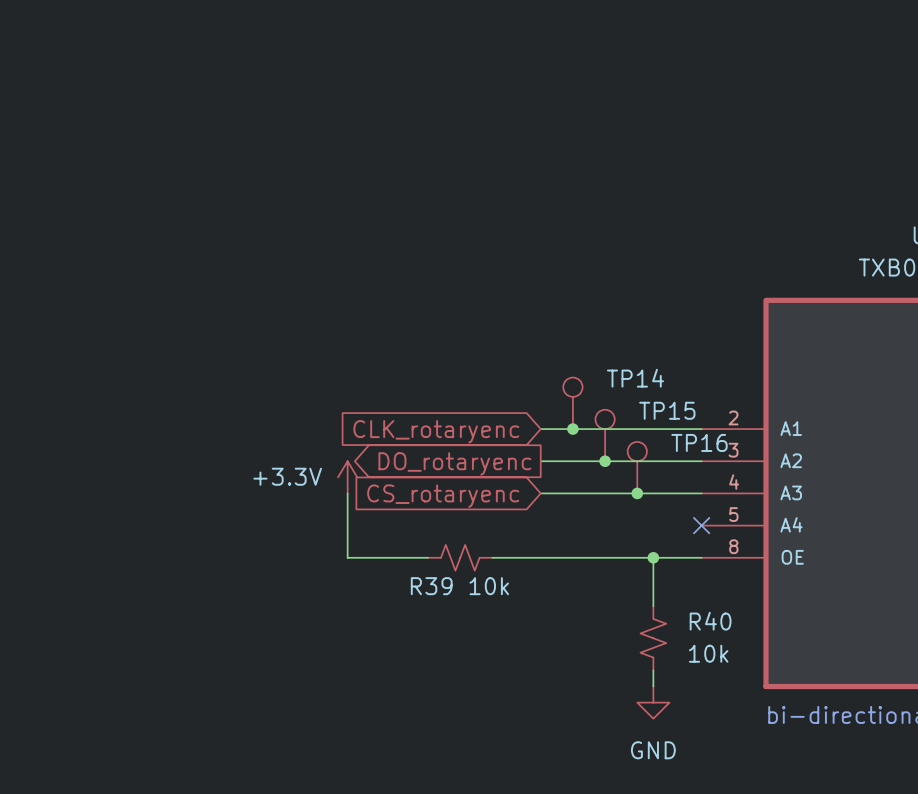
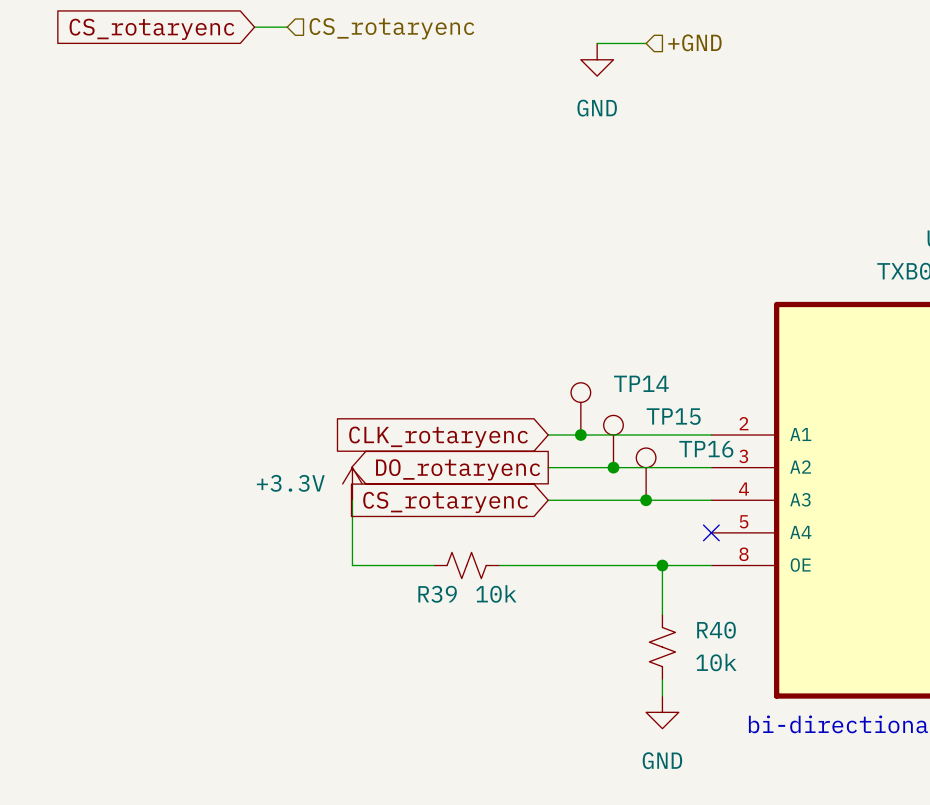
wire: none -> (254, 27) (287, 27)
hierarchical label: none -> CS_rotaryenc (391, 28)
global label: none -> CS_rotaryenc (151, 29)
wire: none -> (597, 43) (646, 43)
hierarchical label: none -> +GND (694, 42)
power symbol: none -> GND (597, 59)

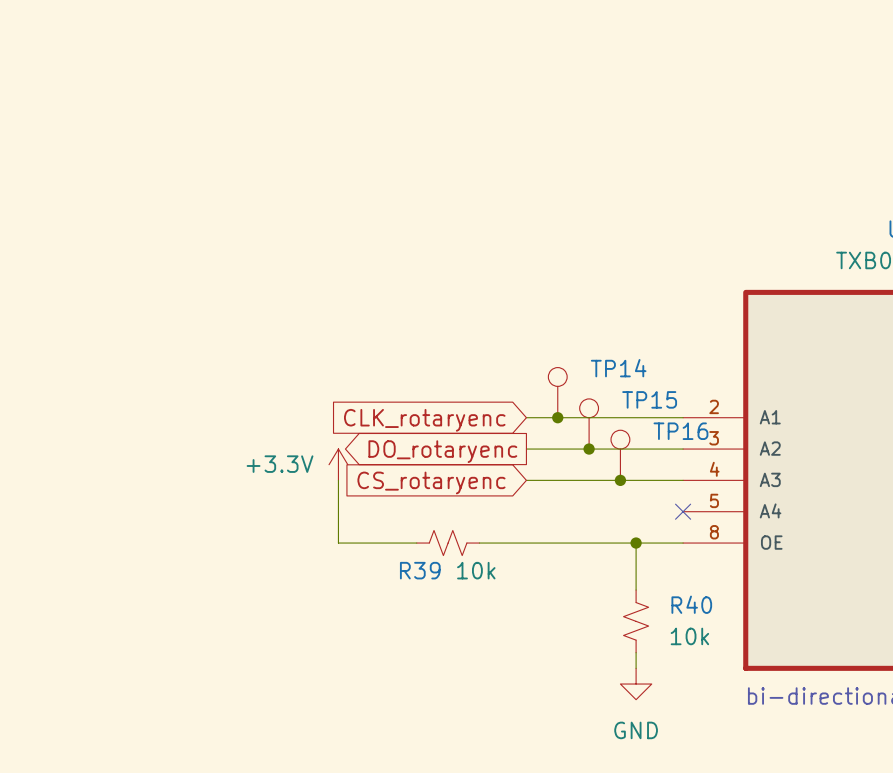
wire: (254, 27) (287, 27) -> none
hierarchical label: CS_rotaryenc (391, 28) -> none
global label: CS_rotaryenc (151, 29) -> none
hierarchical label: +GND (694, 42) -> none
wire: (597, 43) (646, 43) -> none
power symbol: GND (597, 59) -> none

